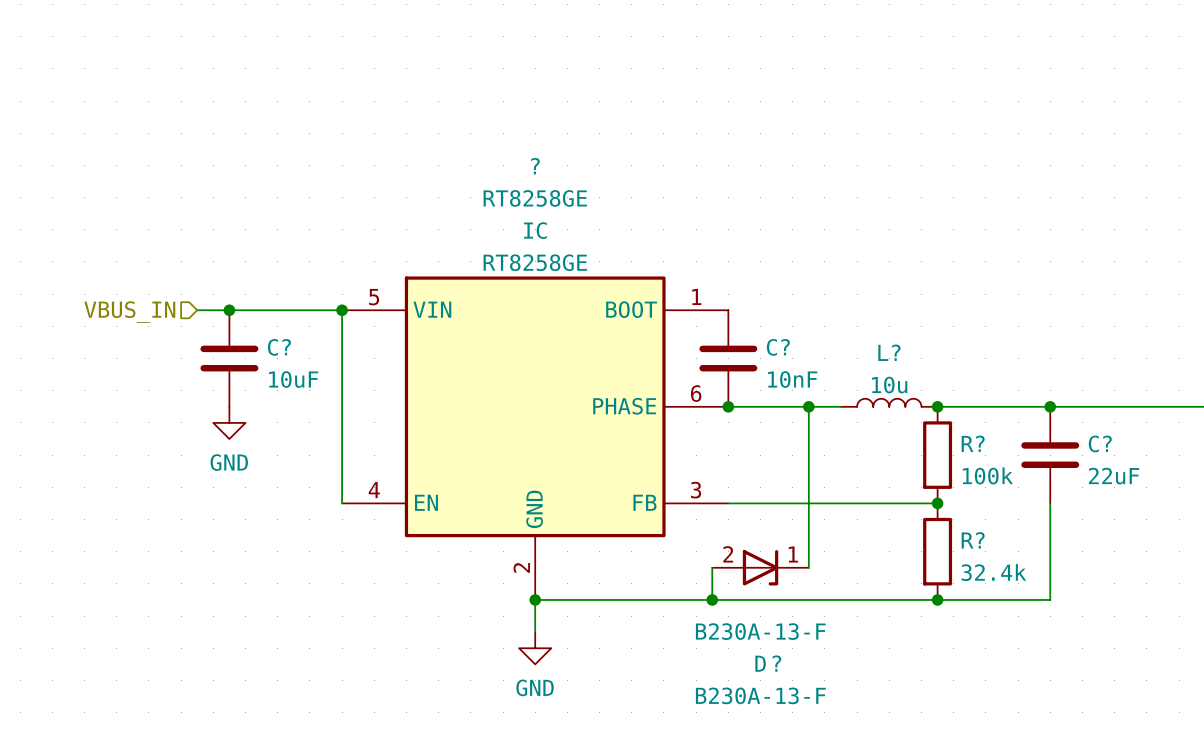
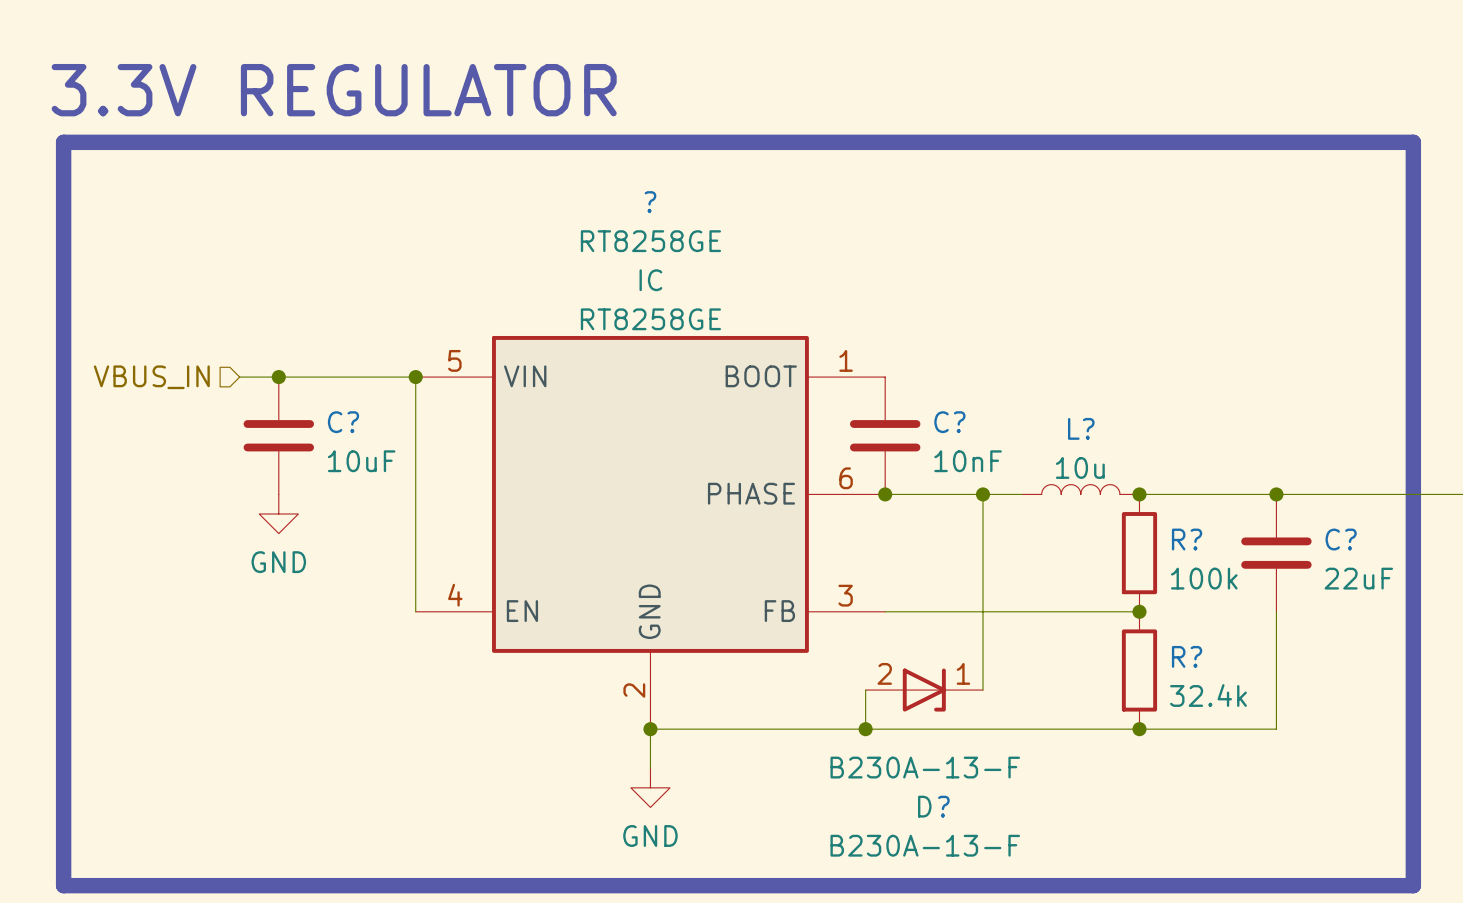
text: none -> 3.3V REGULATOR (334, 90)
line: none -> (63, 142) (63, 885) (1413, 885) (1413, 142) (63, 142)

